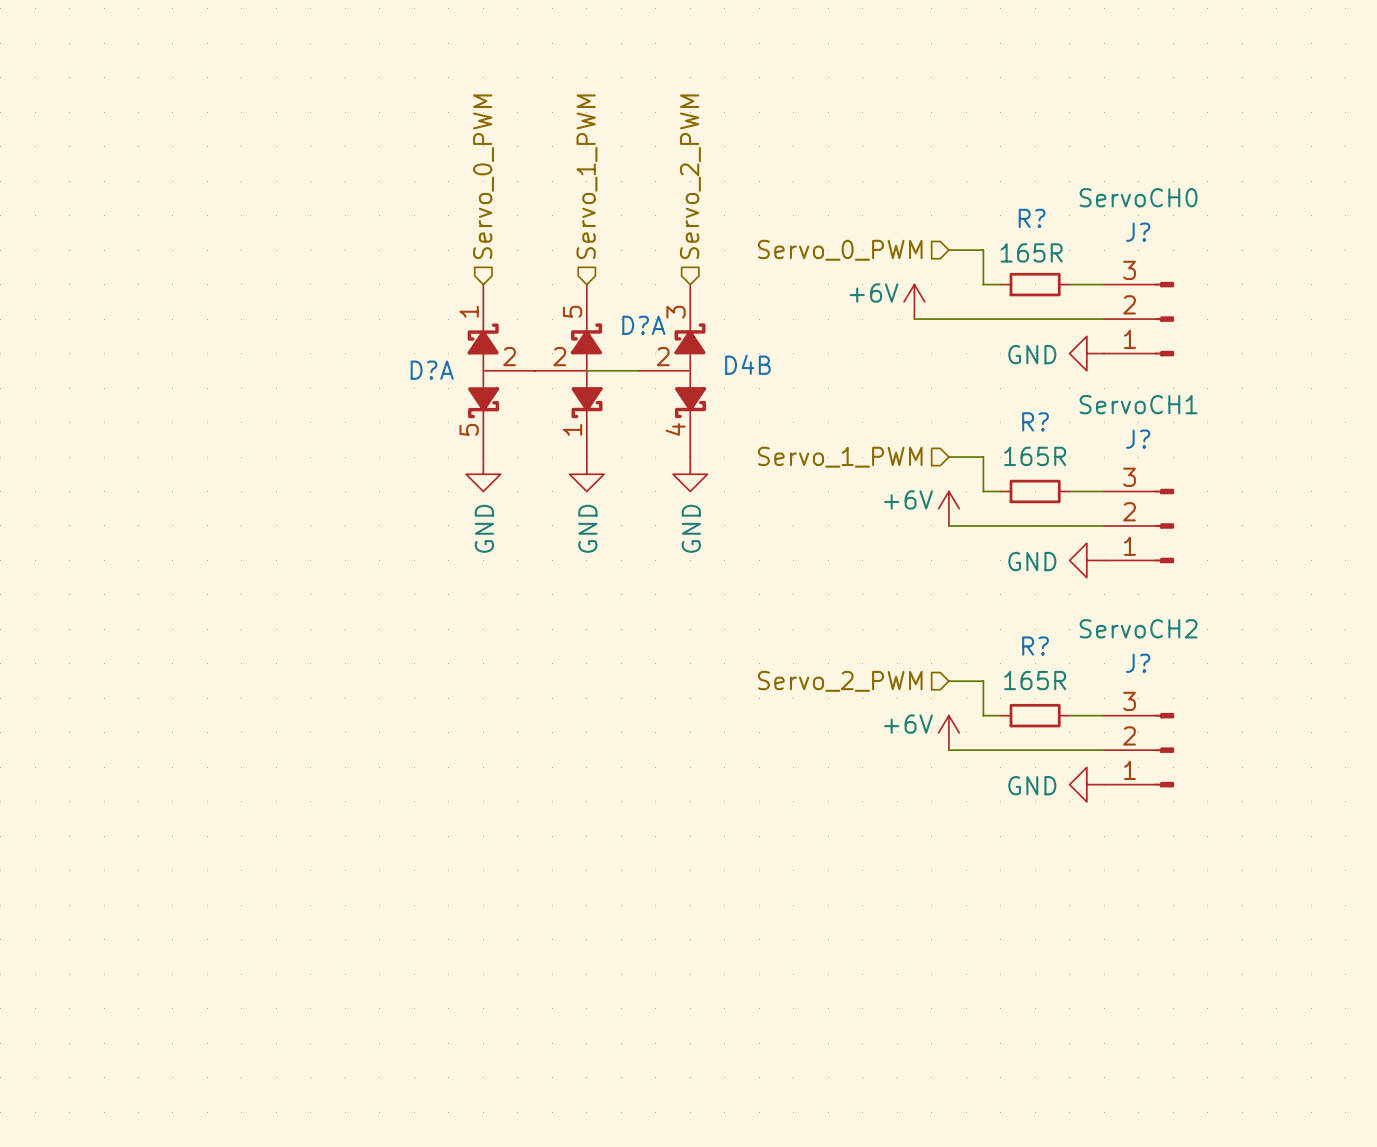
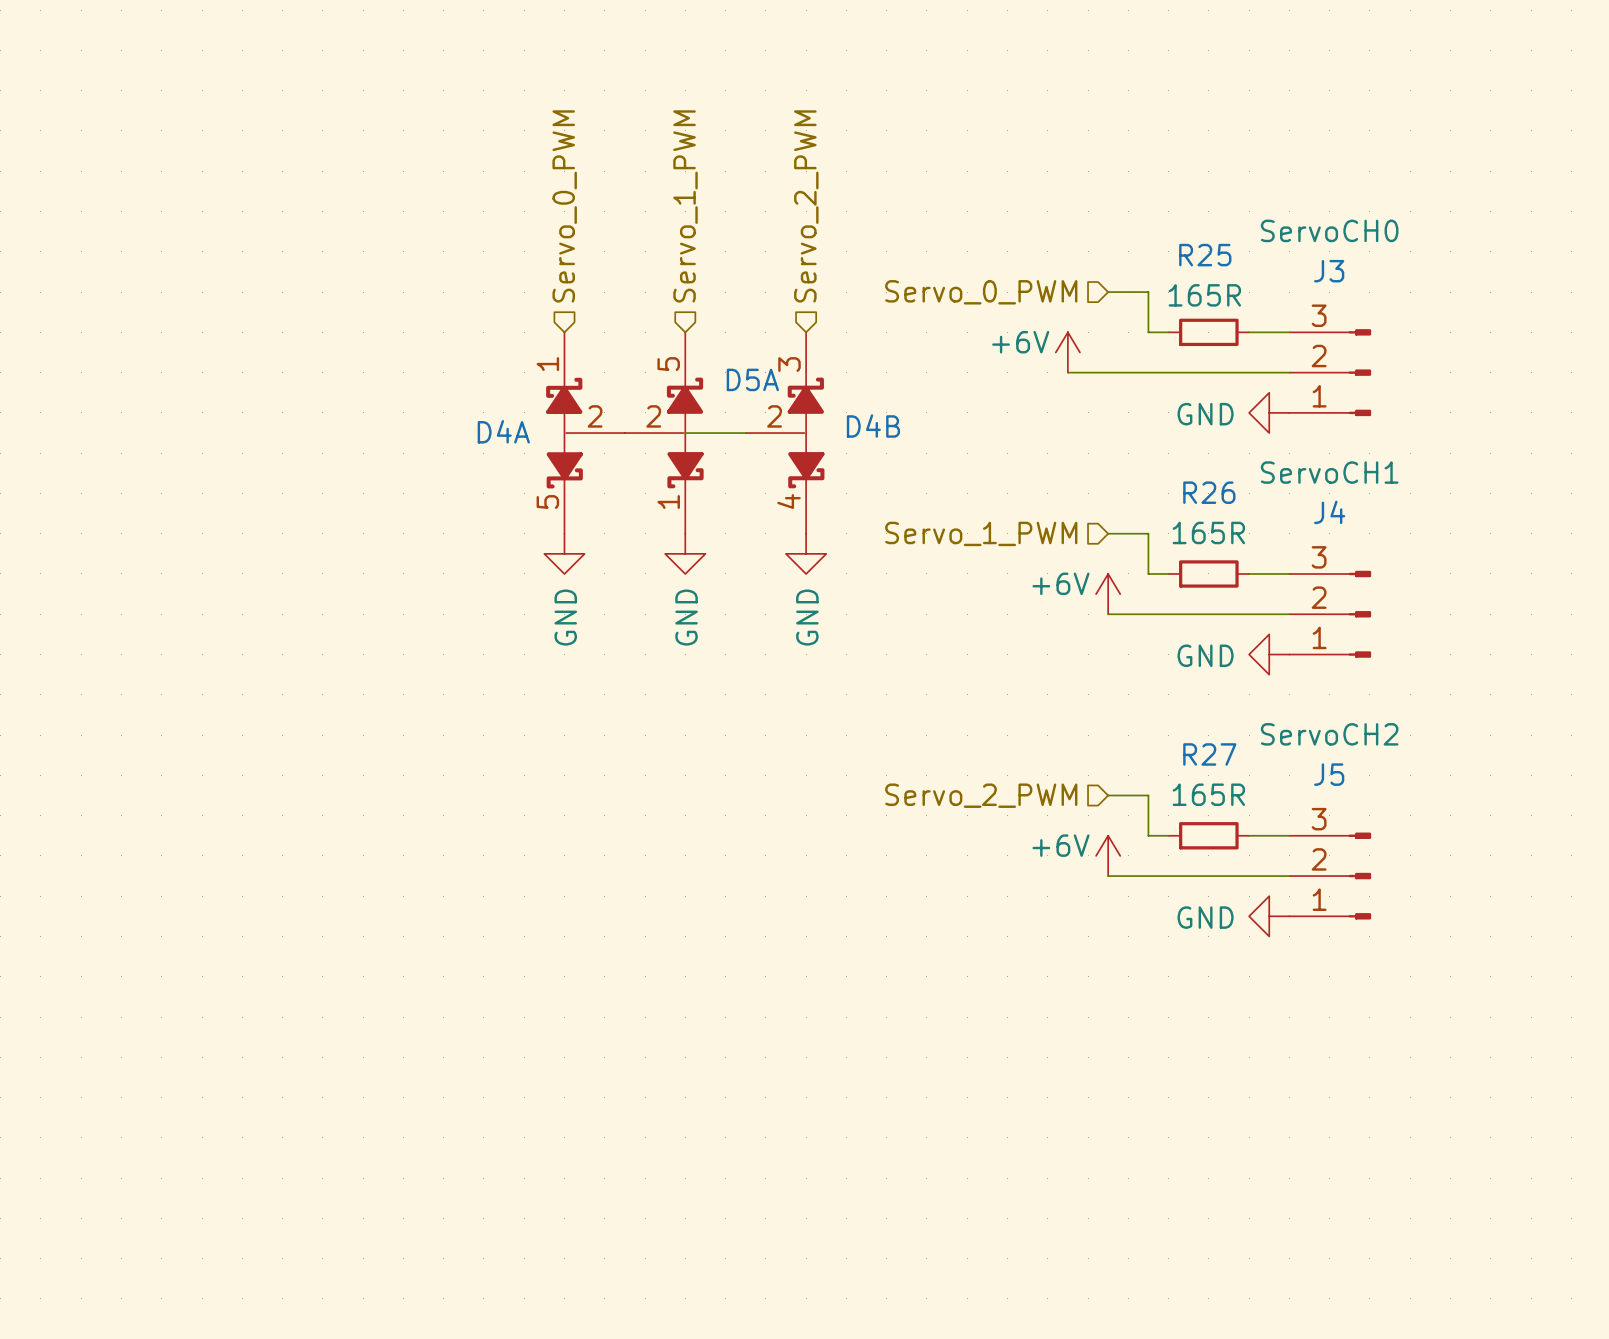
R? name: R? (1032, 218) -> R25 (1205, 255)
J? name: J? (1138, 232) -> J3 (1329, 271)
D?A name: D?A (643, 325) -> D5A (752, 379)
D?A name: D?A (432, 370) -> D4A (503, 431)
R? name: R? (1035, 421) -> R26 (1209, 492)
J? name: J? (1138, 439) -> J4 (1329, 512)
R? name: R? (1035, 646) -> R27 (1209, 754)
J? name: J? (1138, 663) -> J5 (1329, 774)

